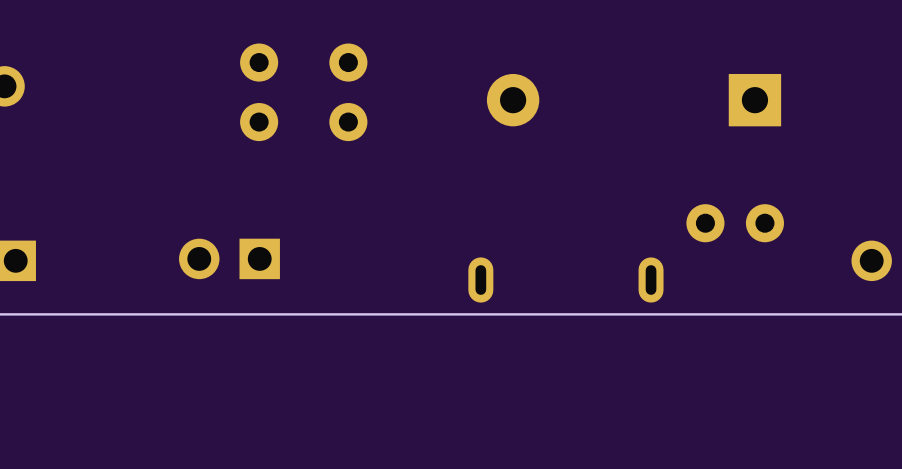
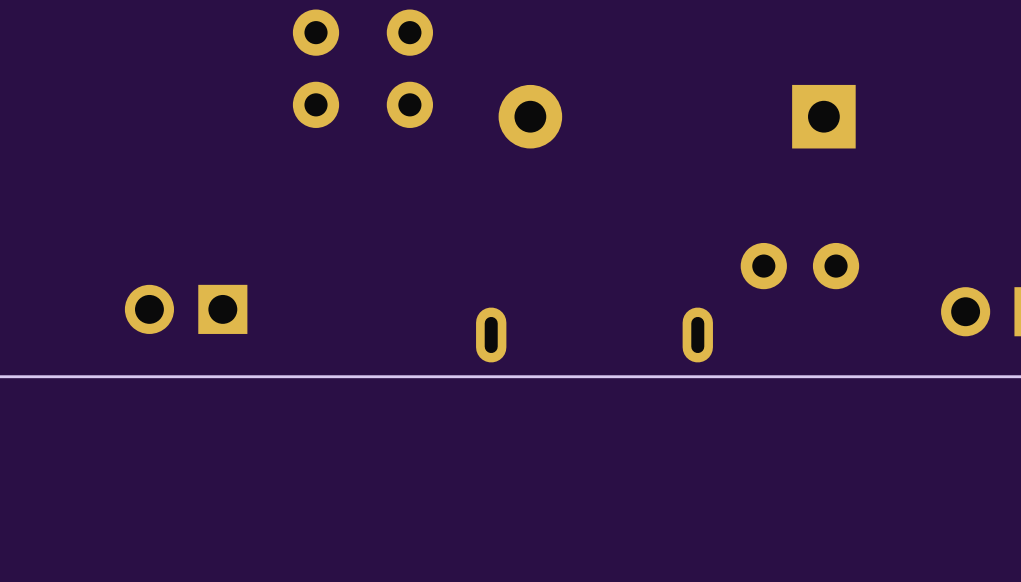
part: none -> (409, 68)
part: (259, 92) -> none
part position: (348, 92) -> (316, 68)

